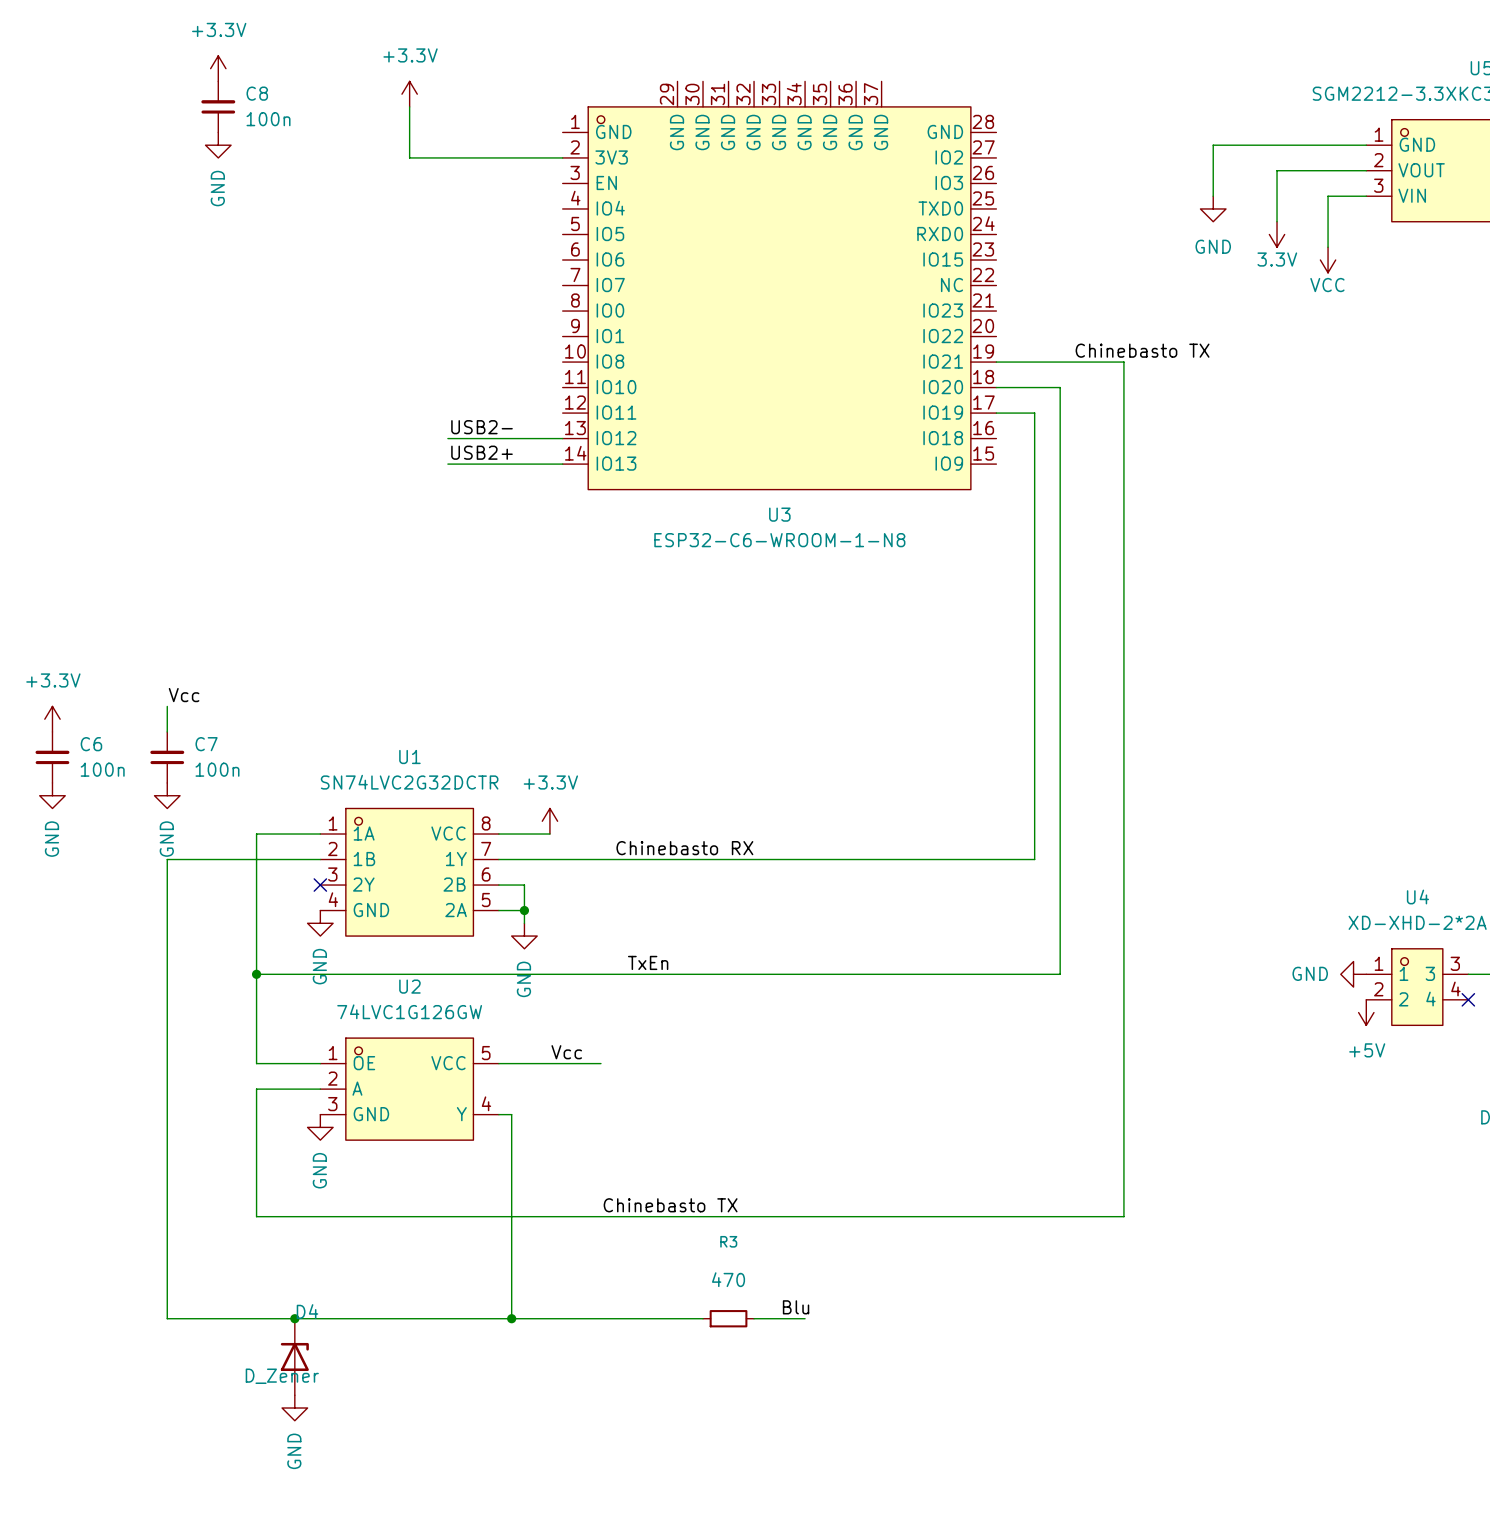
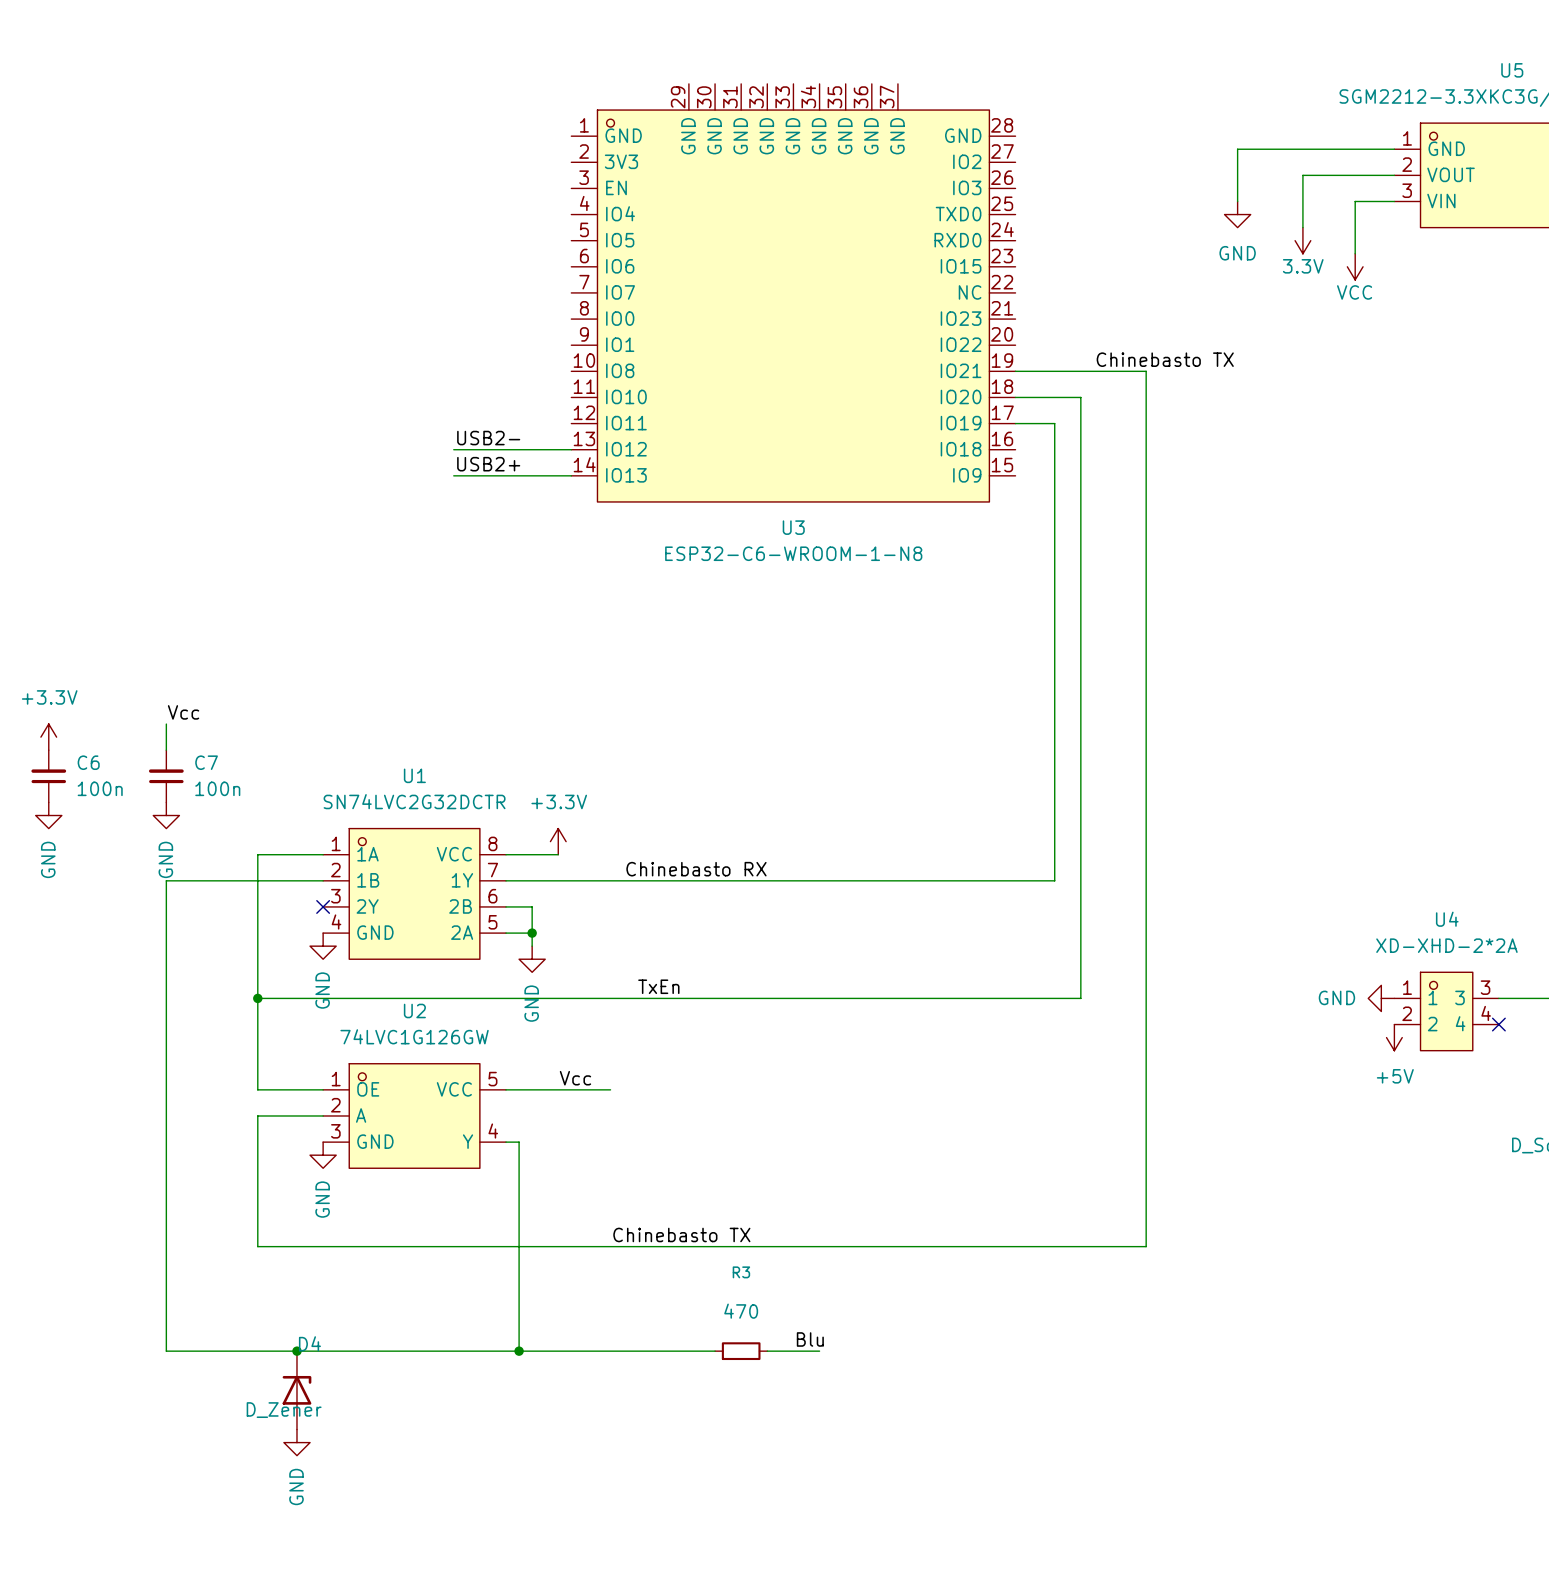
power symbol: +3.3V (218, 68) -> none
power symbol: +3.3V (409, 94) -> none
C8: 100n (218, 106) -> none
wire: (409, 106) (409, 157) (562, 157) -> none
power symbol: GND (218, 145) -> none

